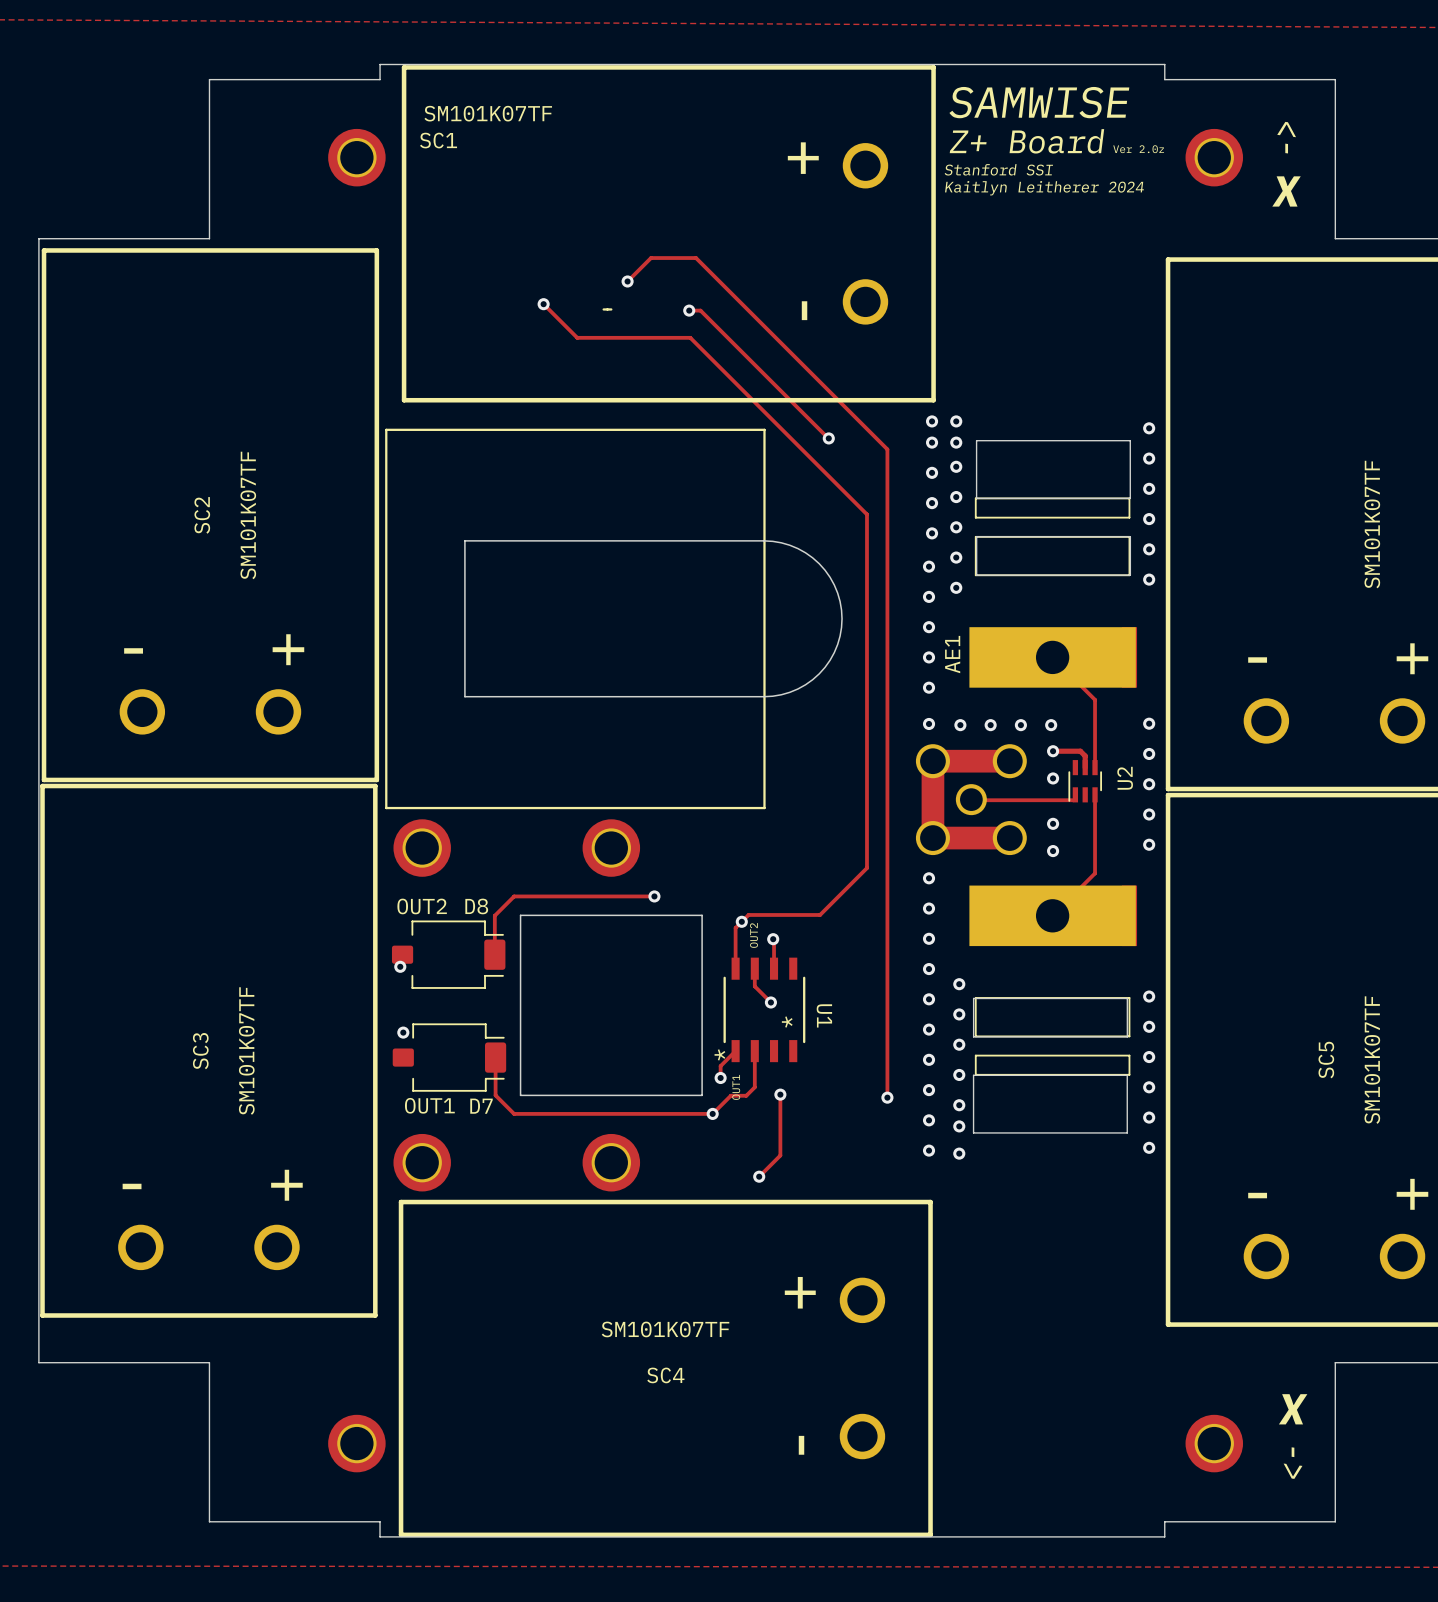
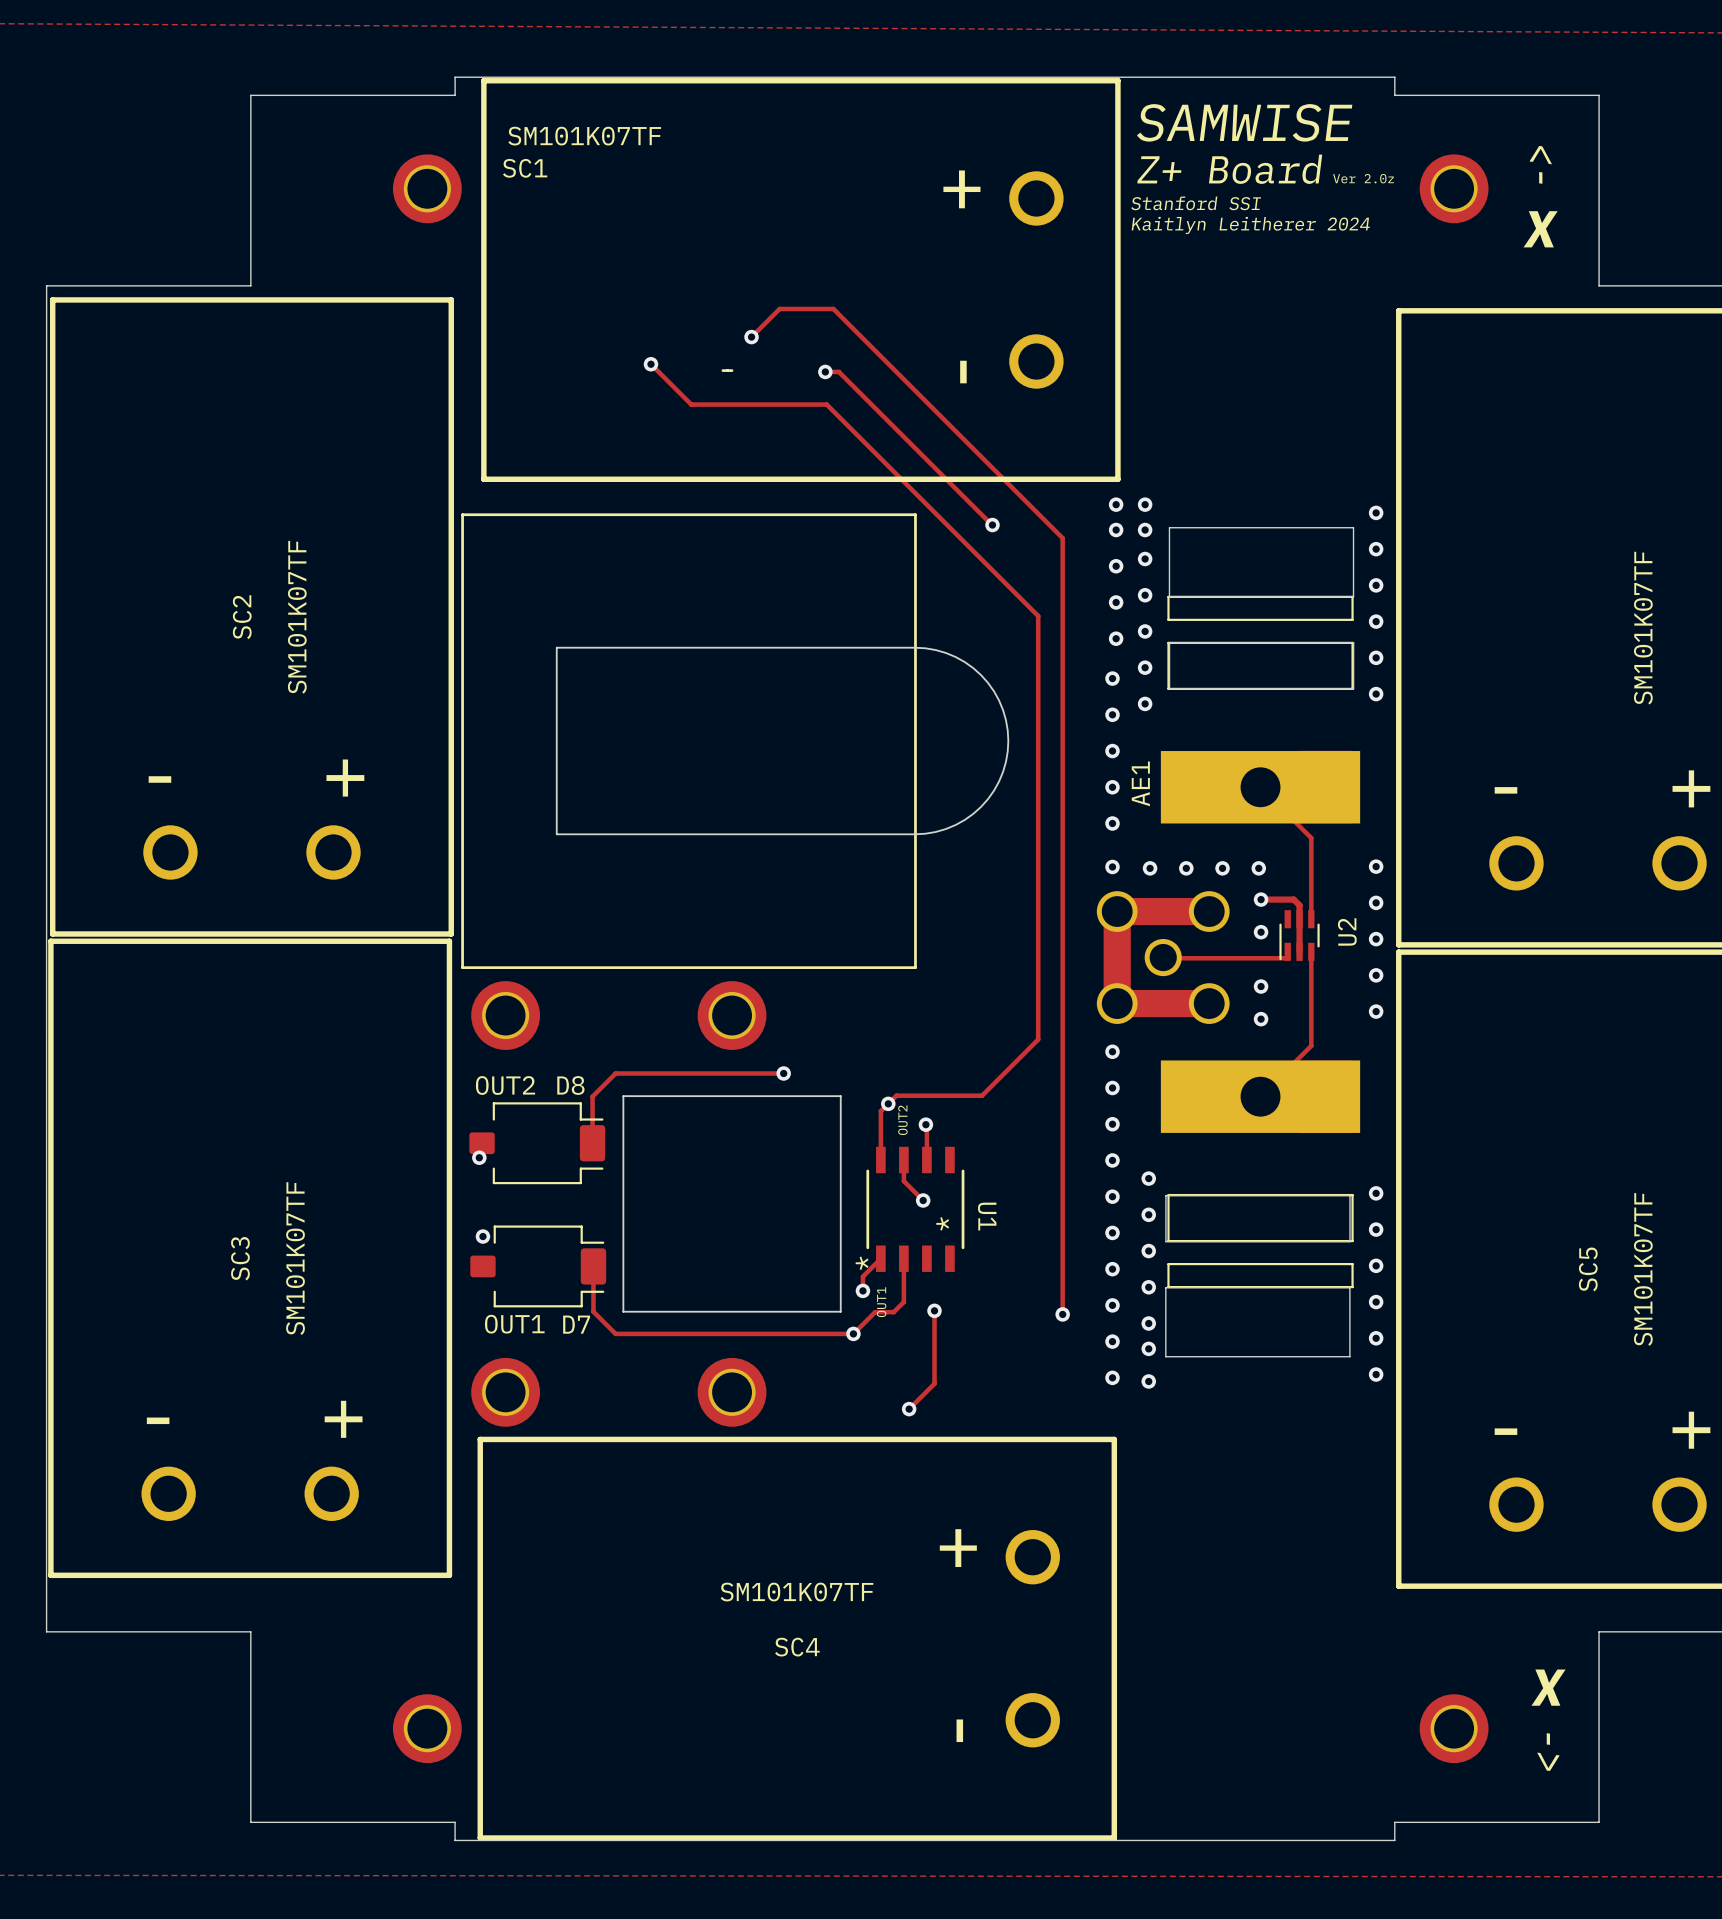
AE1 footprint: [969, 497, 1138, 1076] -> [1160, 595, 1361, 1289]
track: none -> (1299, 919) (1299, 951)

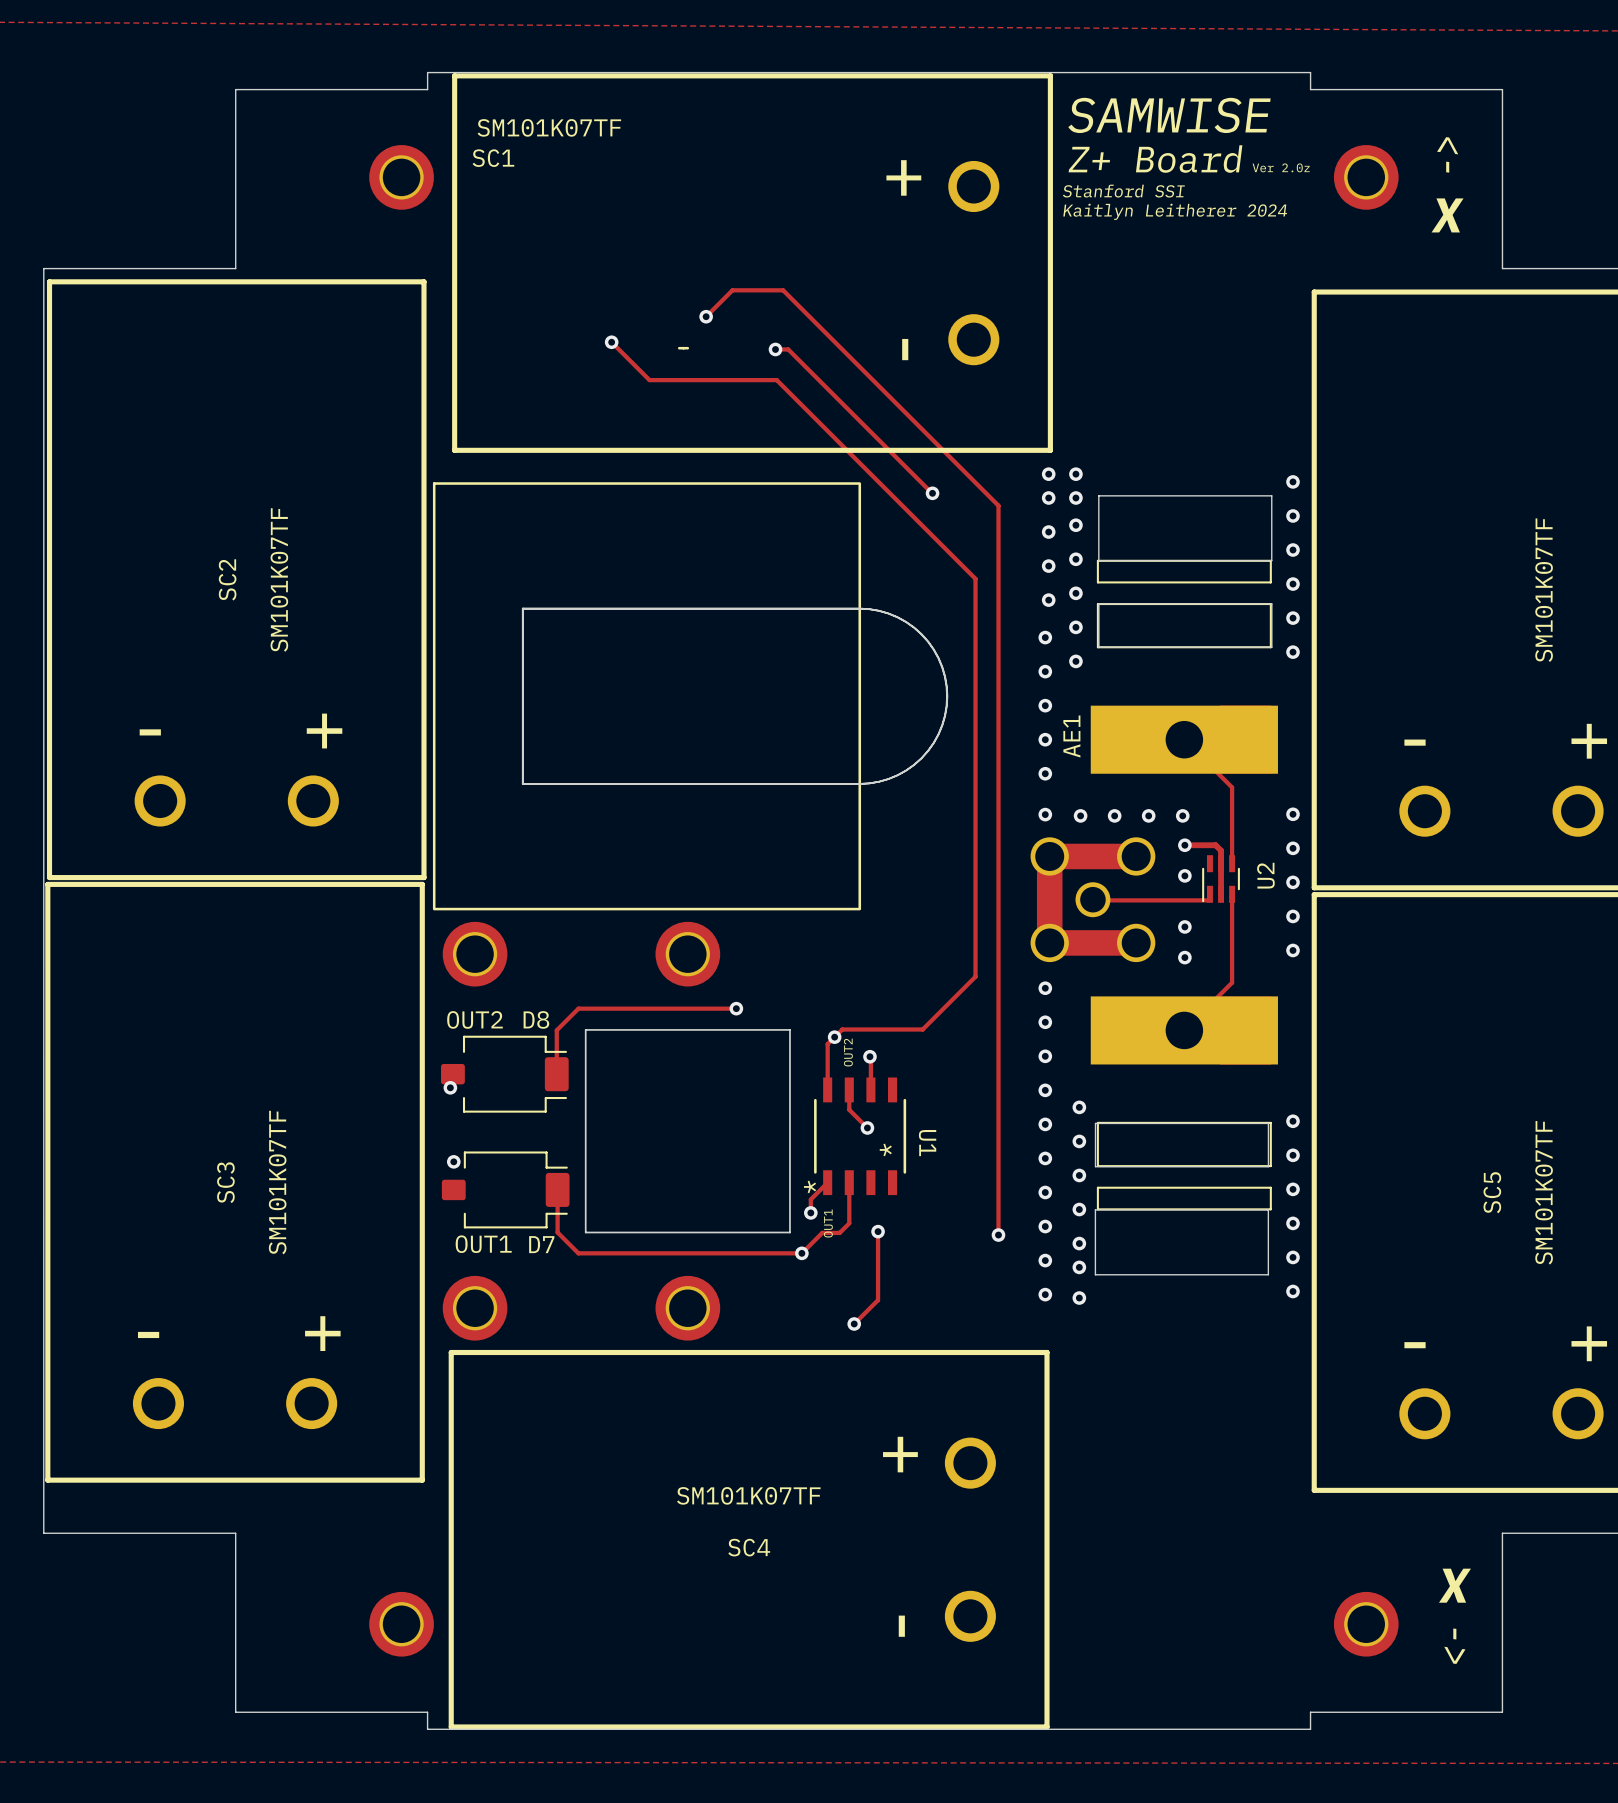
drawing: none -> [432, 482, 948, 911]
line: (462, 514) (915, 514) (915, 967) (462, 967) (462, 514) -> none

